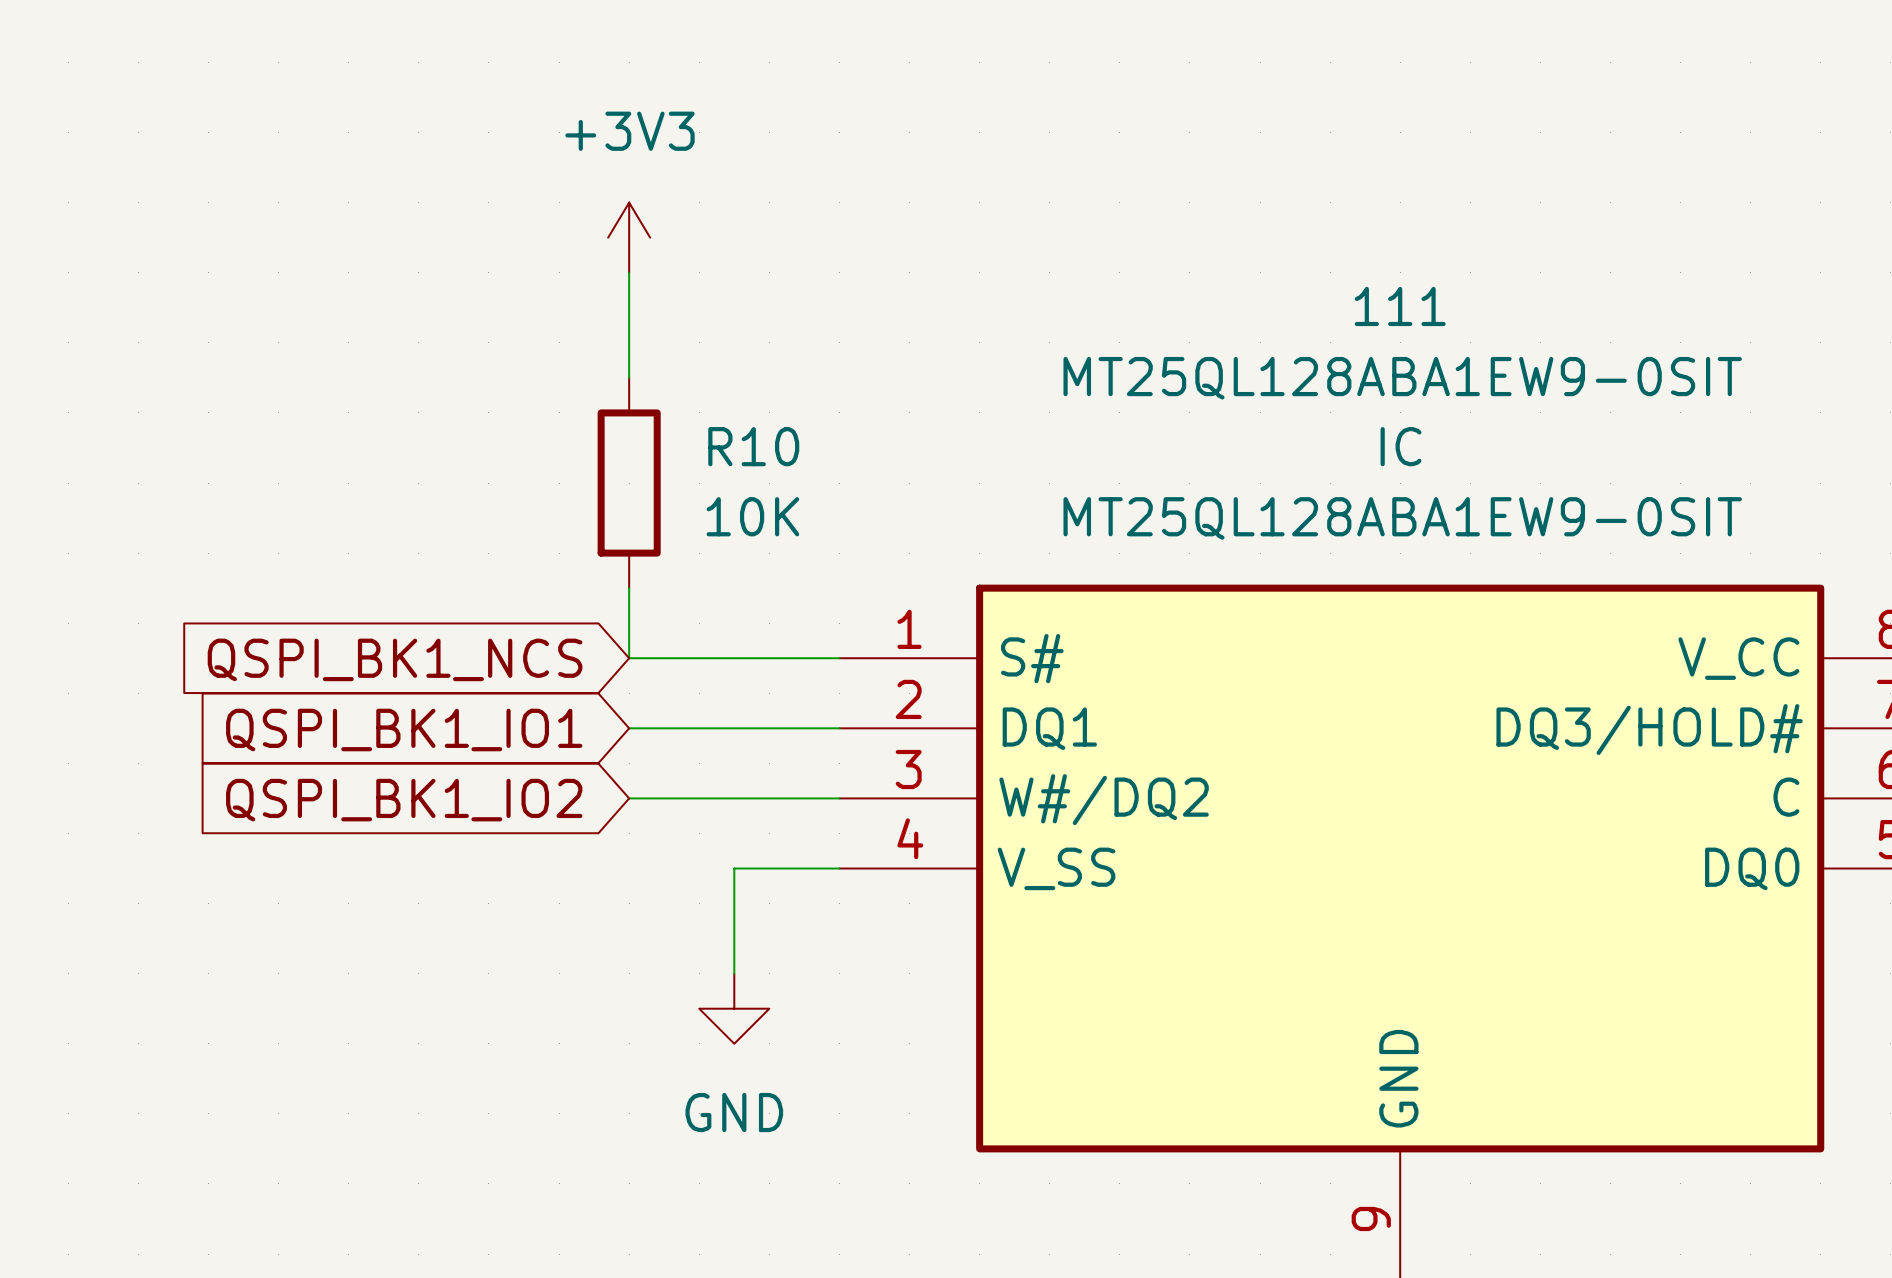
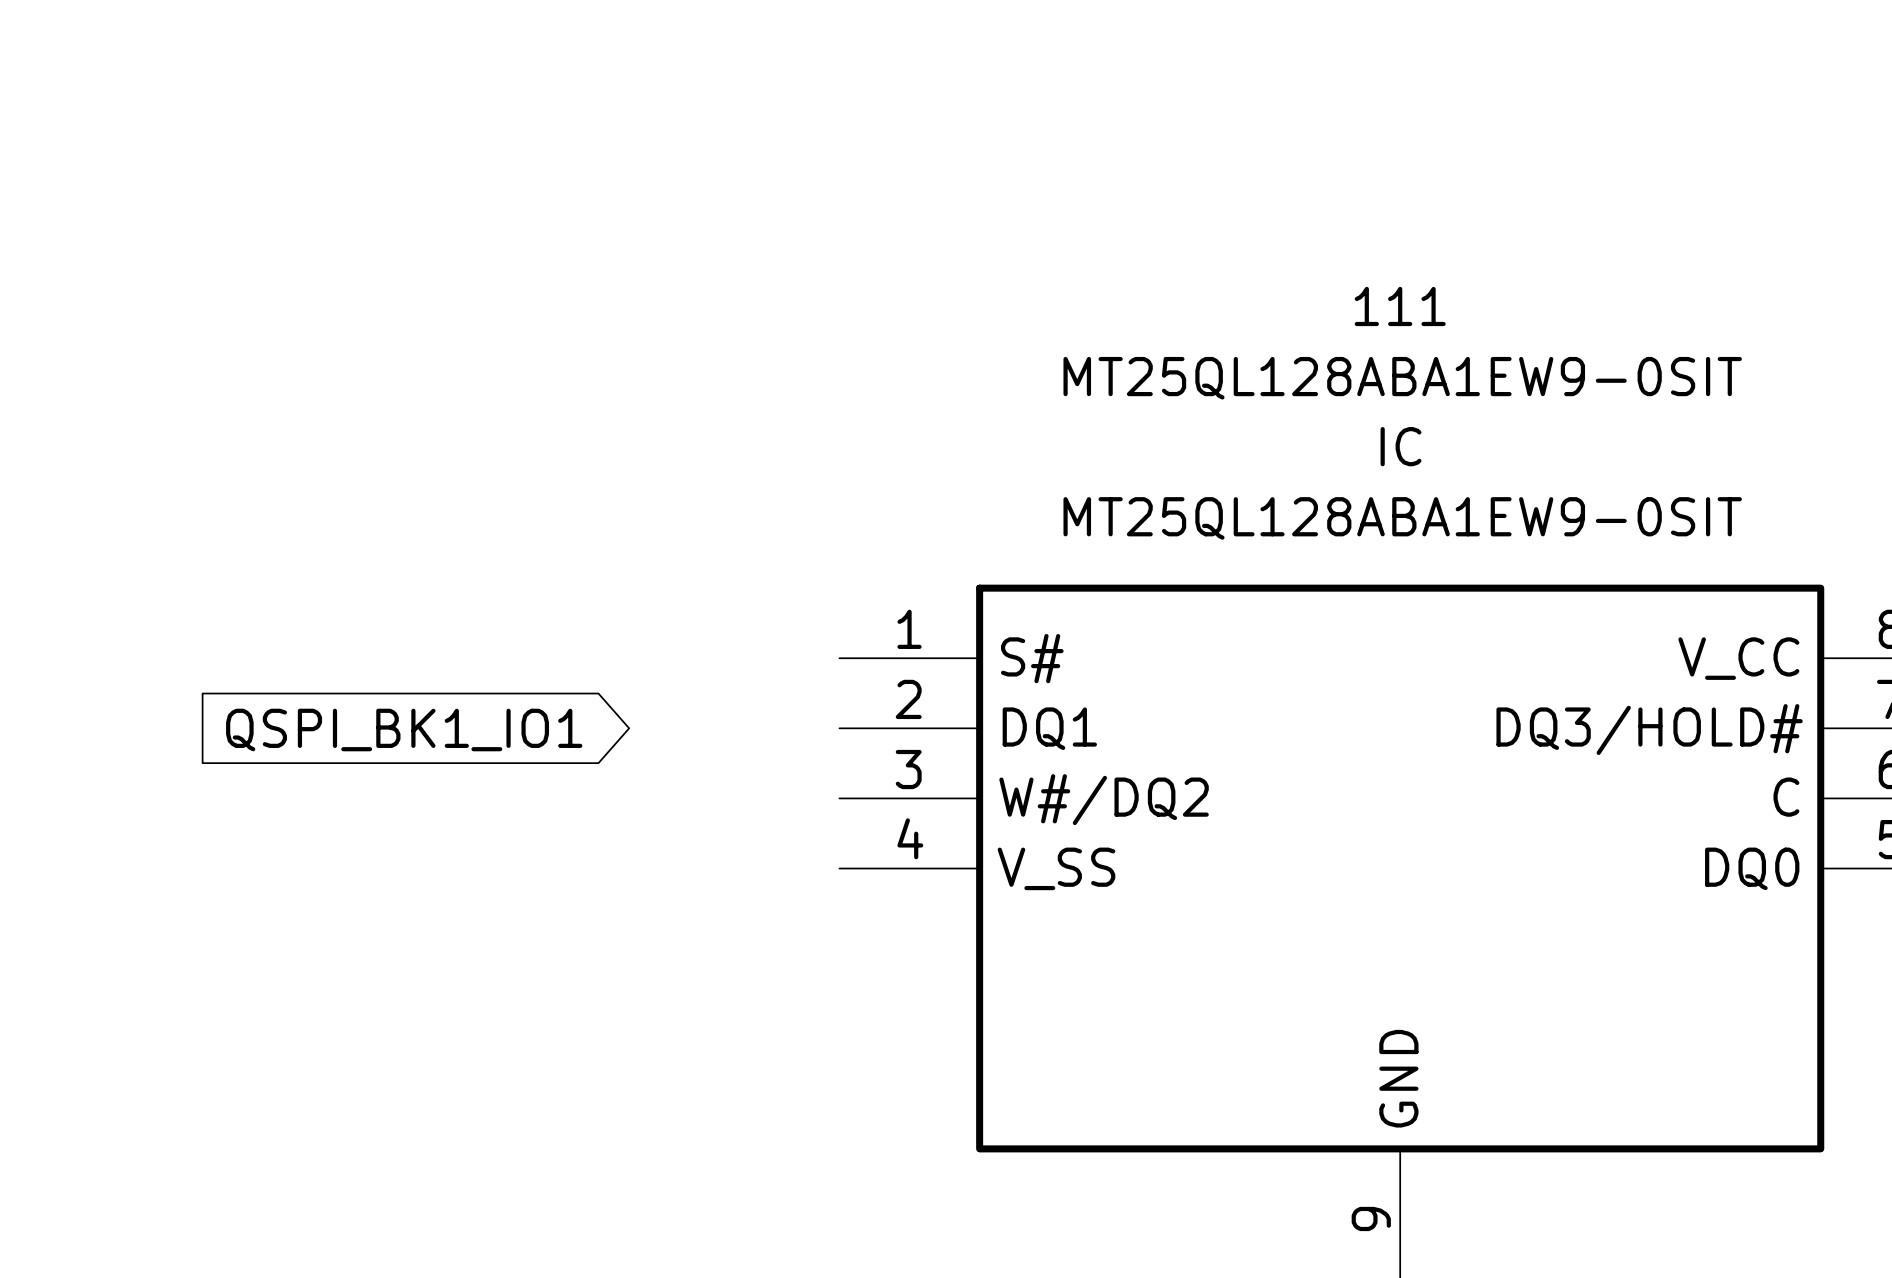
power symbol: +3V3 (629, 237) -> none
wire: (629, 272) (629, 377) -> none
R10: 10K (629, 483) -> none
wire: (629, 588) (629, 658) (839, 658) -> none
global label: QSPI_BK1_NCS (395, 659) -> none
wire: (629, 728) (839, 728) -> none
wire: (629, 798) (839, 798) -> none
global label: QSPI_BK1_IO2 (404, 800) -> none
wire: (839, 868) (734, 868) (734, 973) -> none
power symbol: GND (734, 1008) -> none

